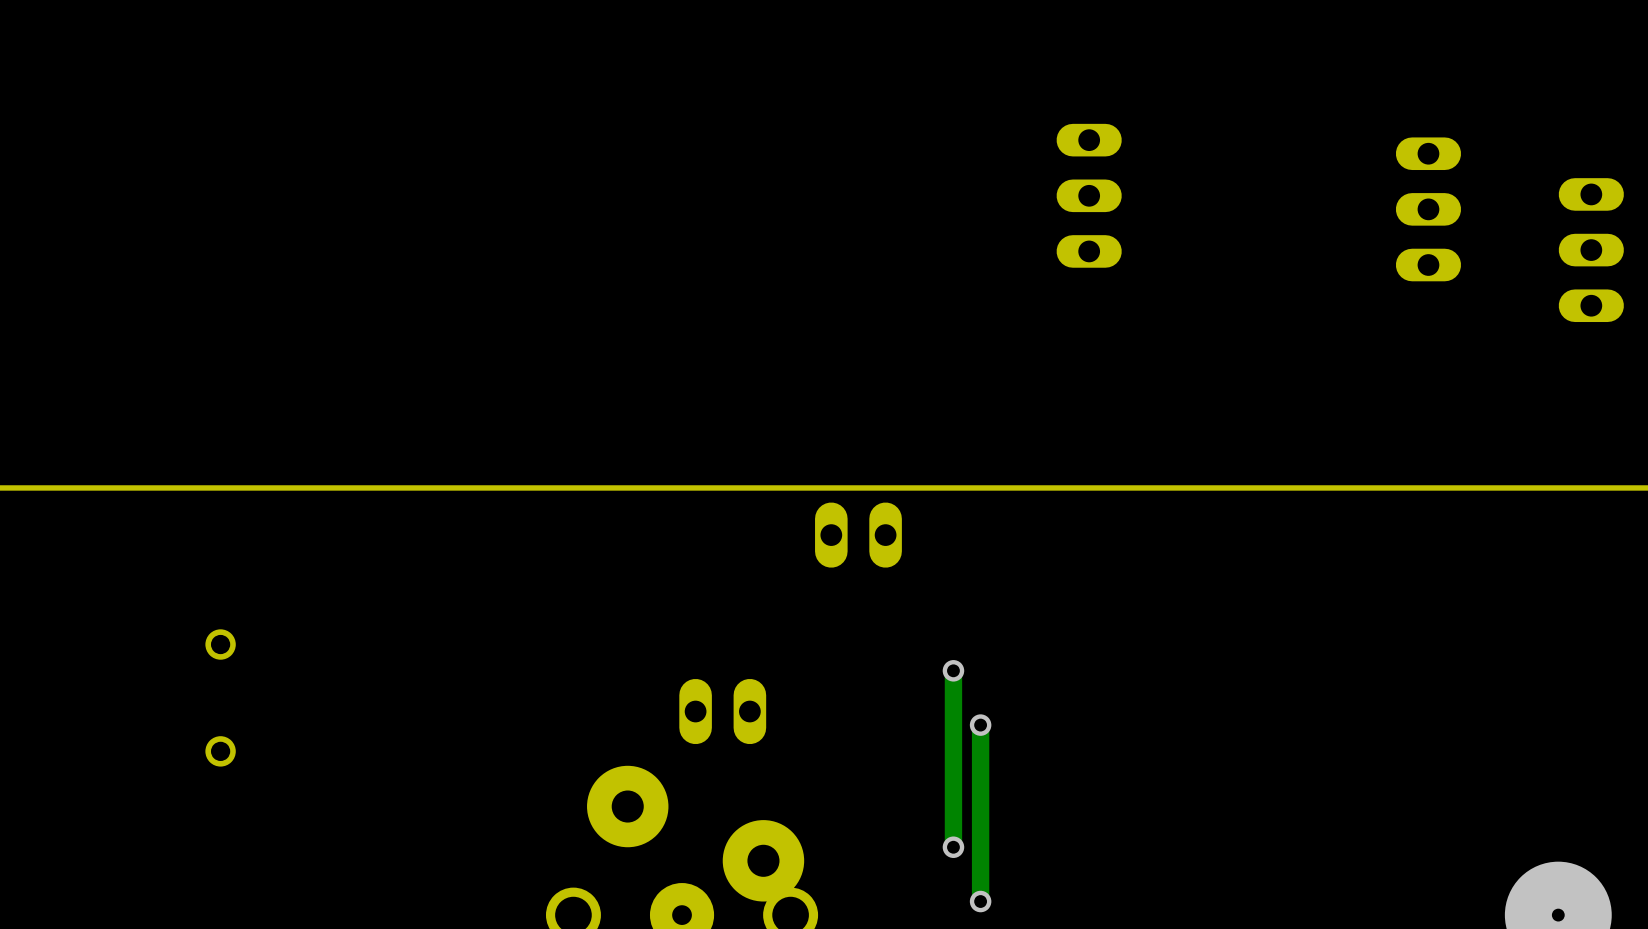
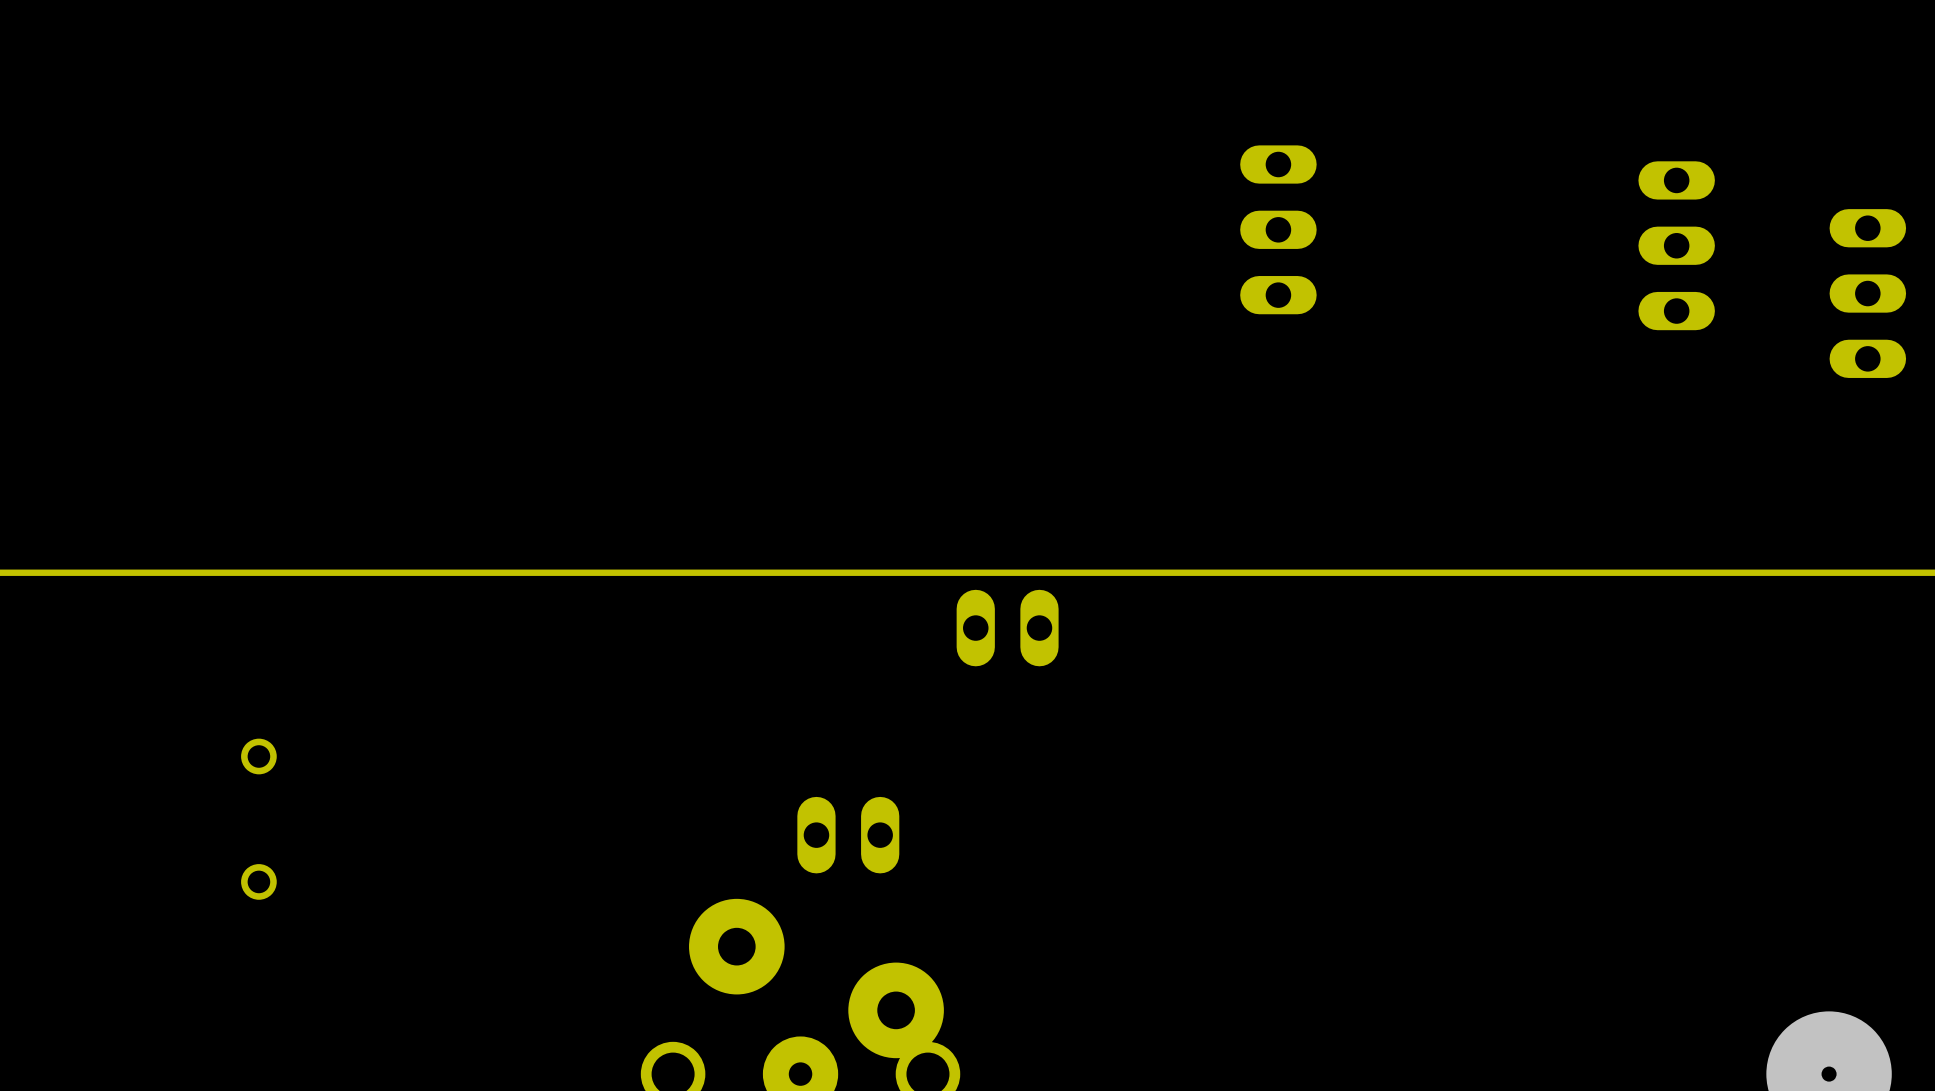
track: (953, 670) (953, 847) -> none
via: (953, 670) -> none
track: (980, 725) (980, 901) -> none
via: (980, 725) -> none
via: (953, 847) -> none
via: (980, 901) -> none

